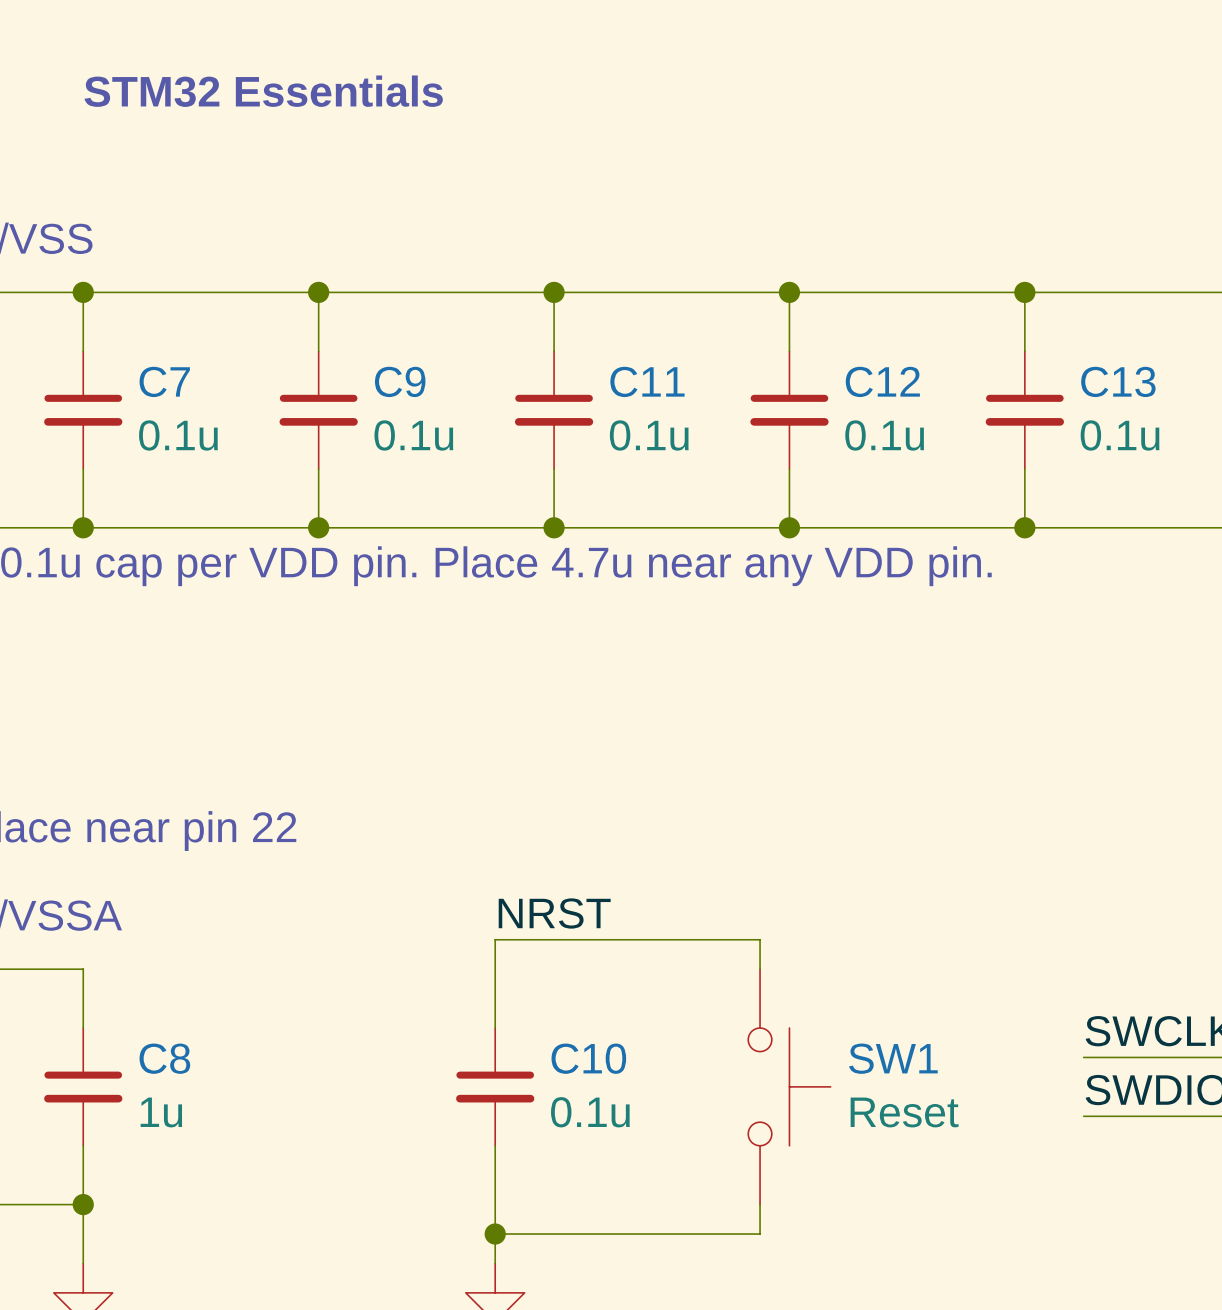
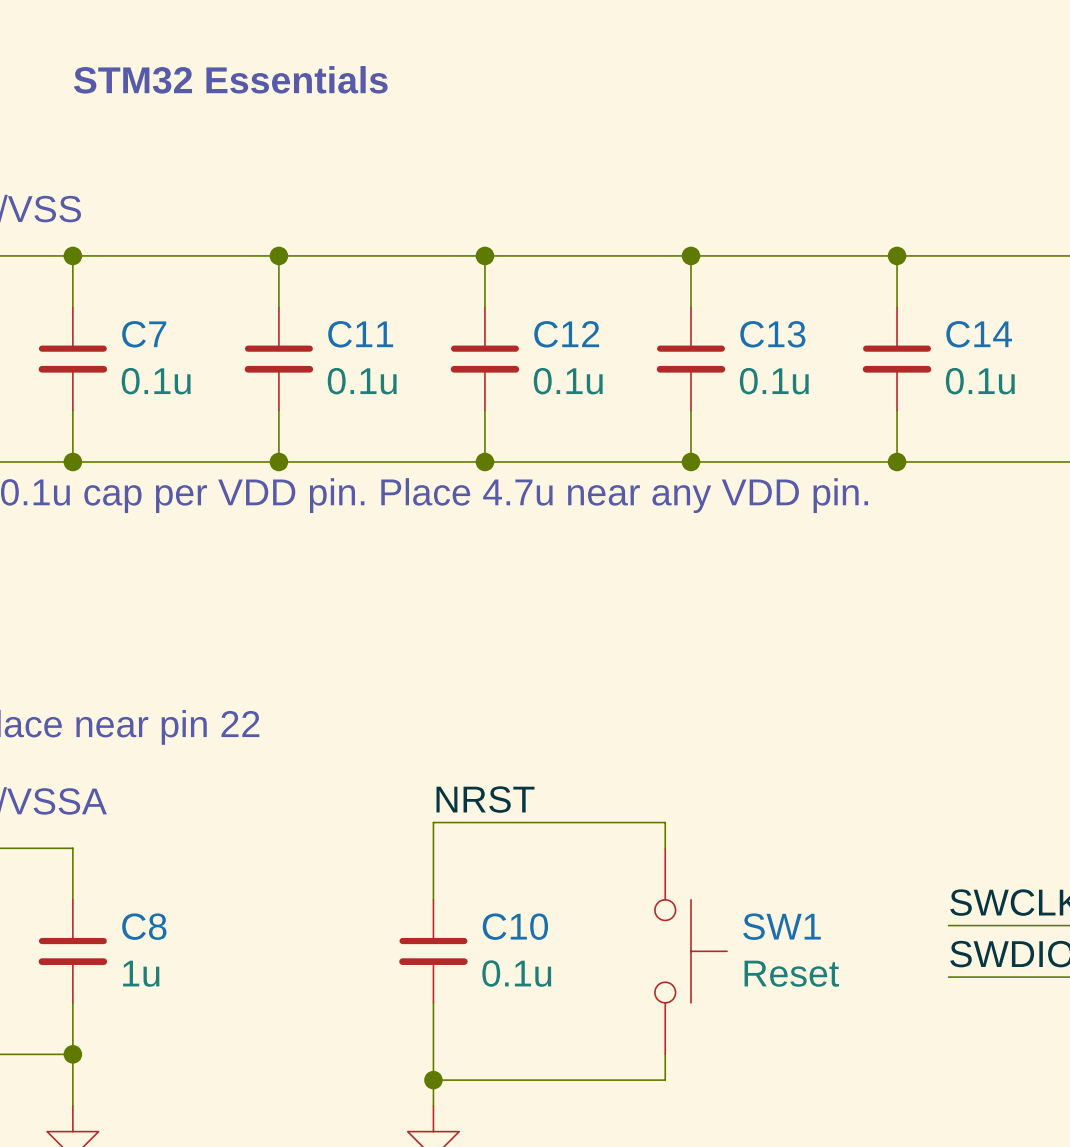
C9 name: C9 (400, 381) -> C11 (360, 334)
C11 name: C11 (647, 381) -> C12 (566, 334)
C12 name: C12 (882, 381) -> C13 (772, 334)
C13 name: C13 (1118, 381) -> C14 (979, 334)

